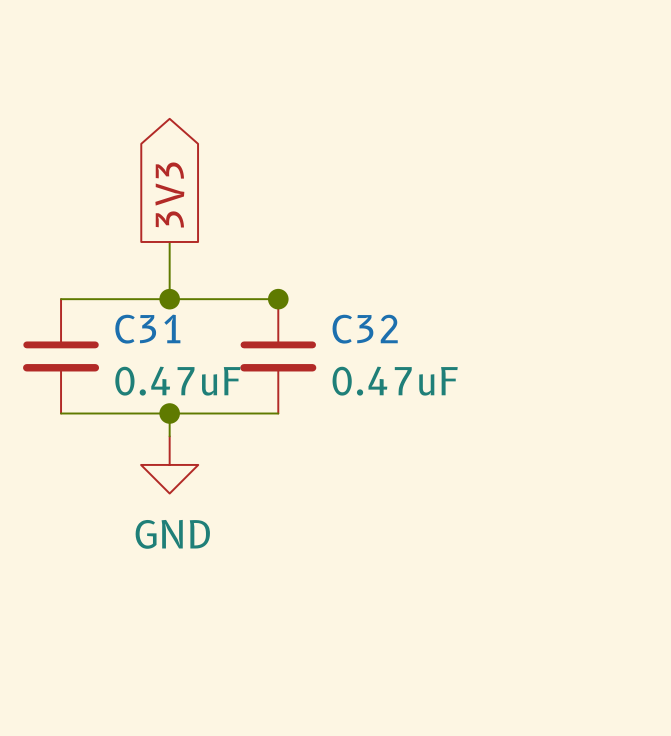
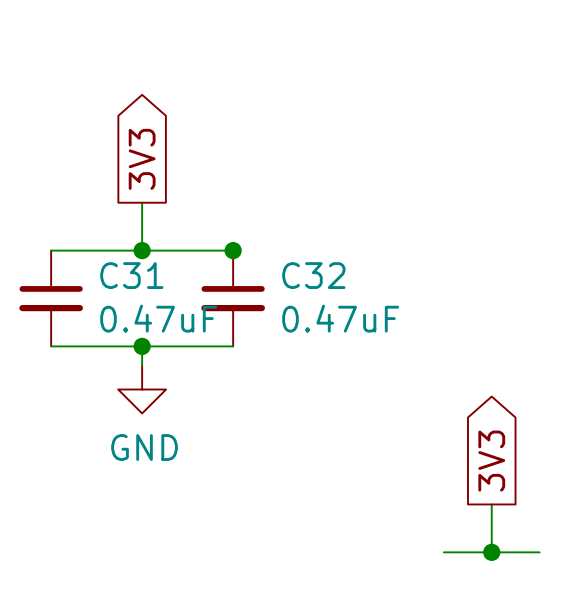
global label: none -> 3V3 (491, 461)
wire: none -> (491, 504) (491, 552)
wire: none -> (443, 552) (539, 552)
junction: none -> (491, 552)

